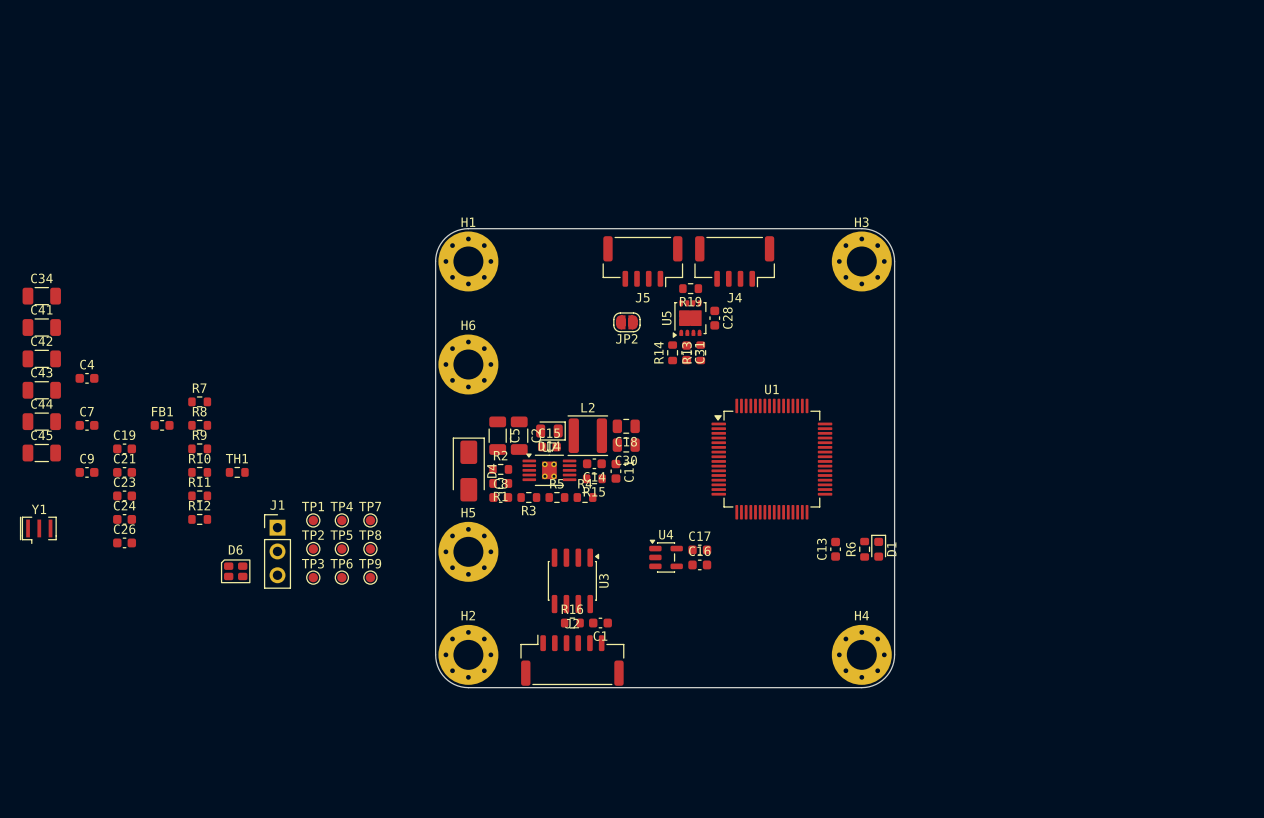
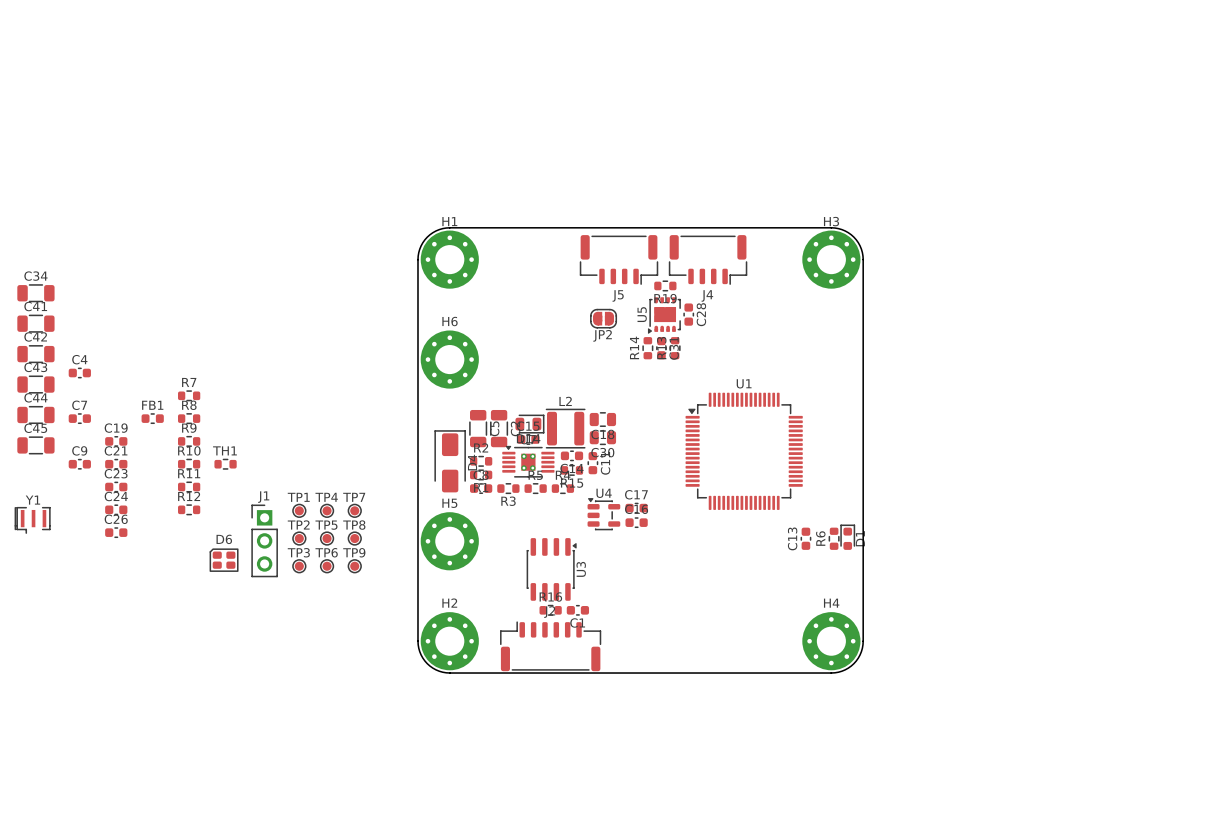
C17 position: (699, 549) -> (636, 508)
U4 position: (666, 556) -> (603, 514)
C16 position: (699, 564) -> (636, 522)

